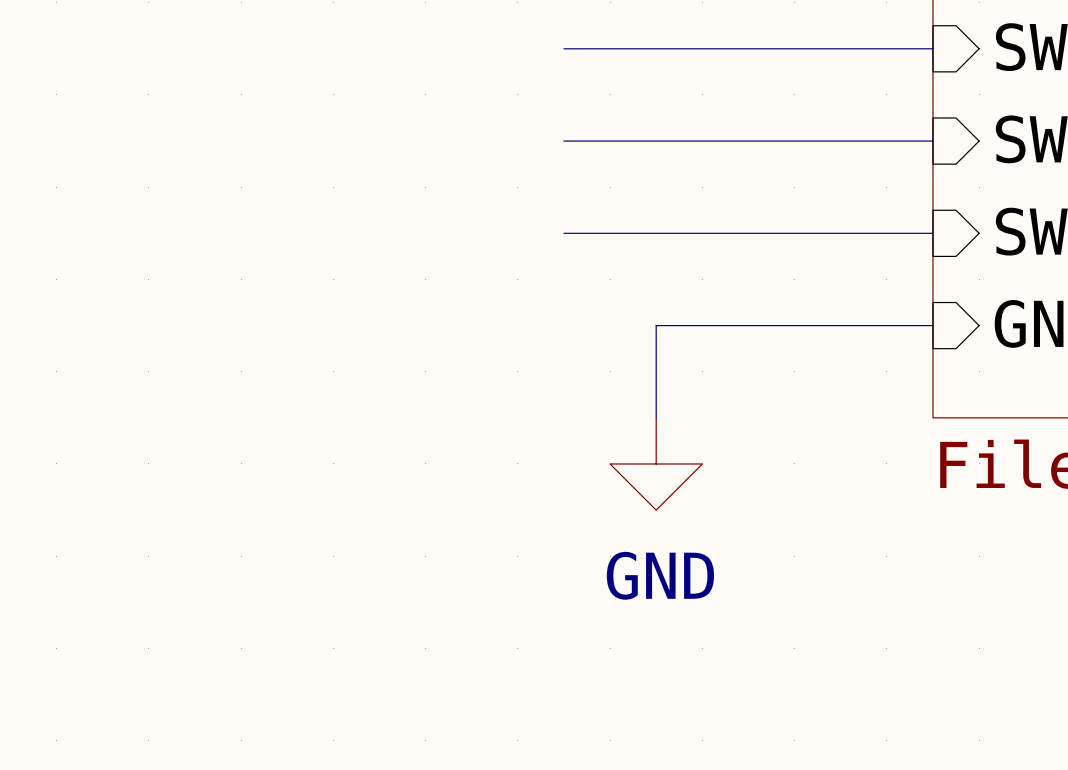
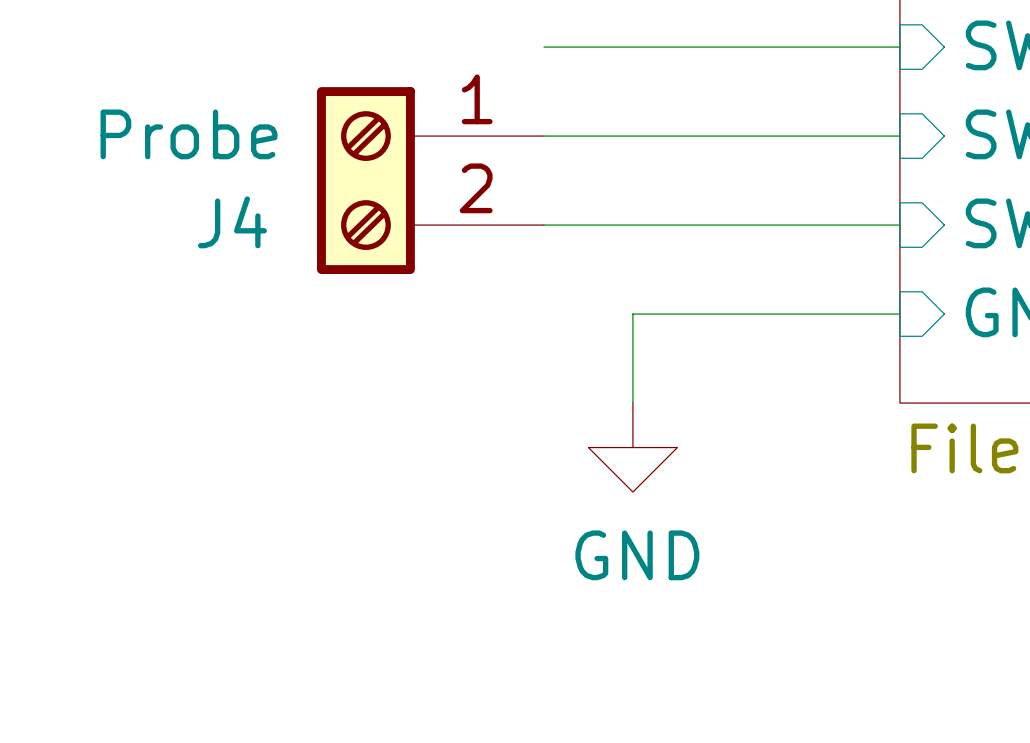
J4: none -> Probe (430, 180)

